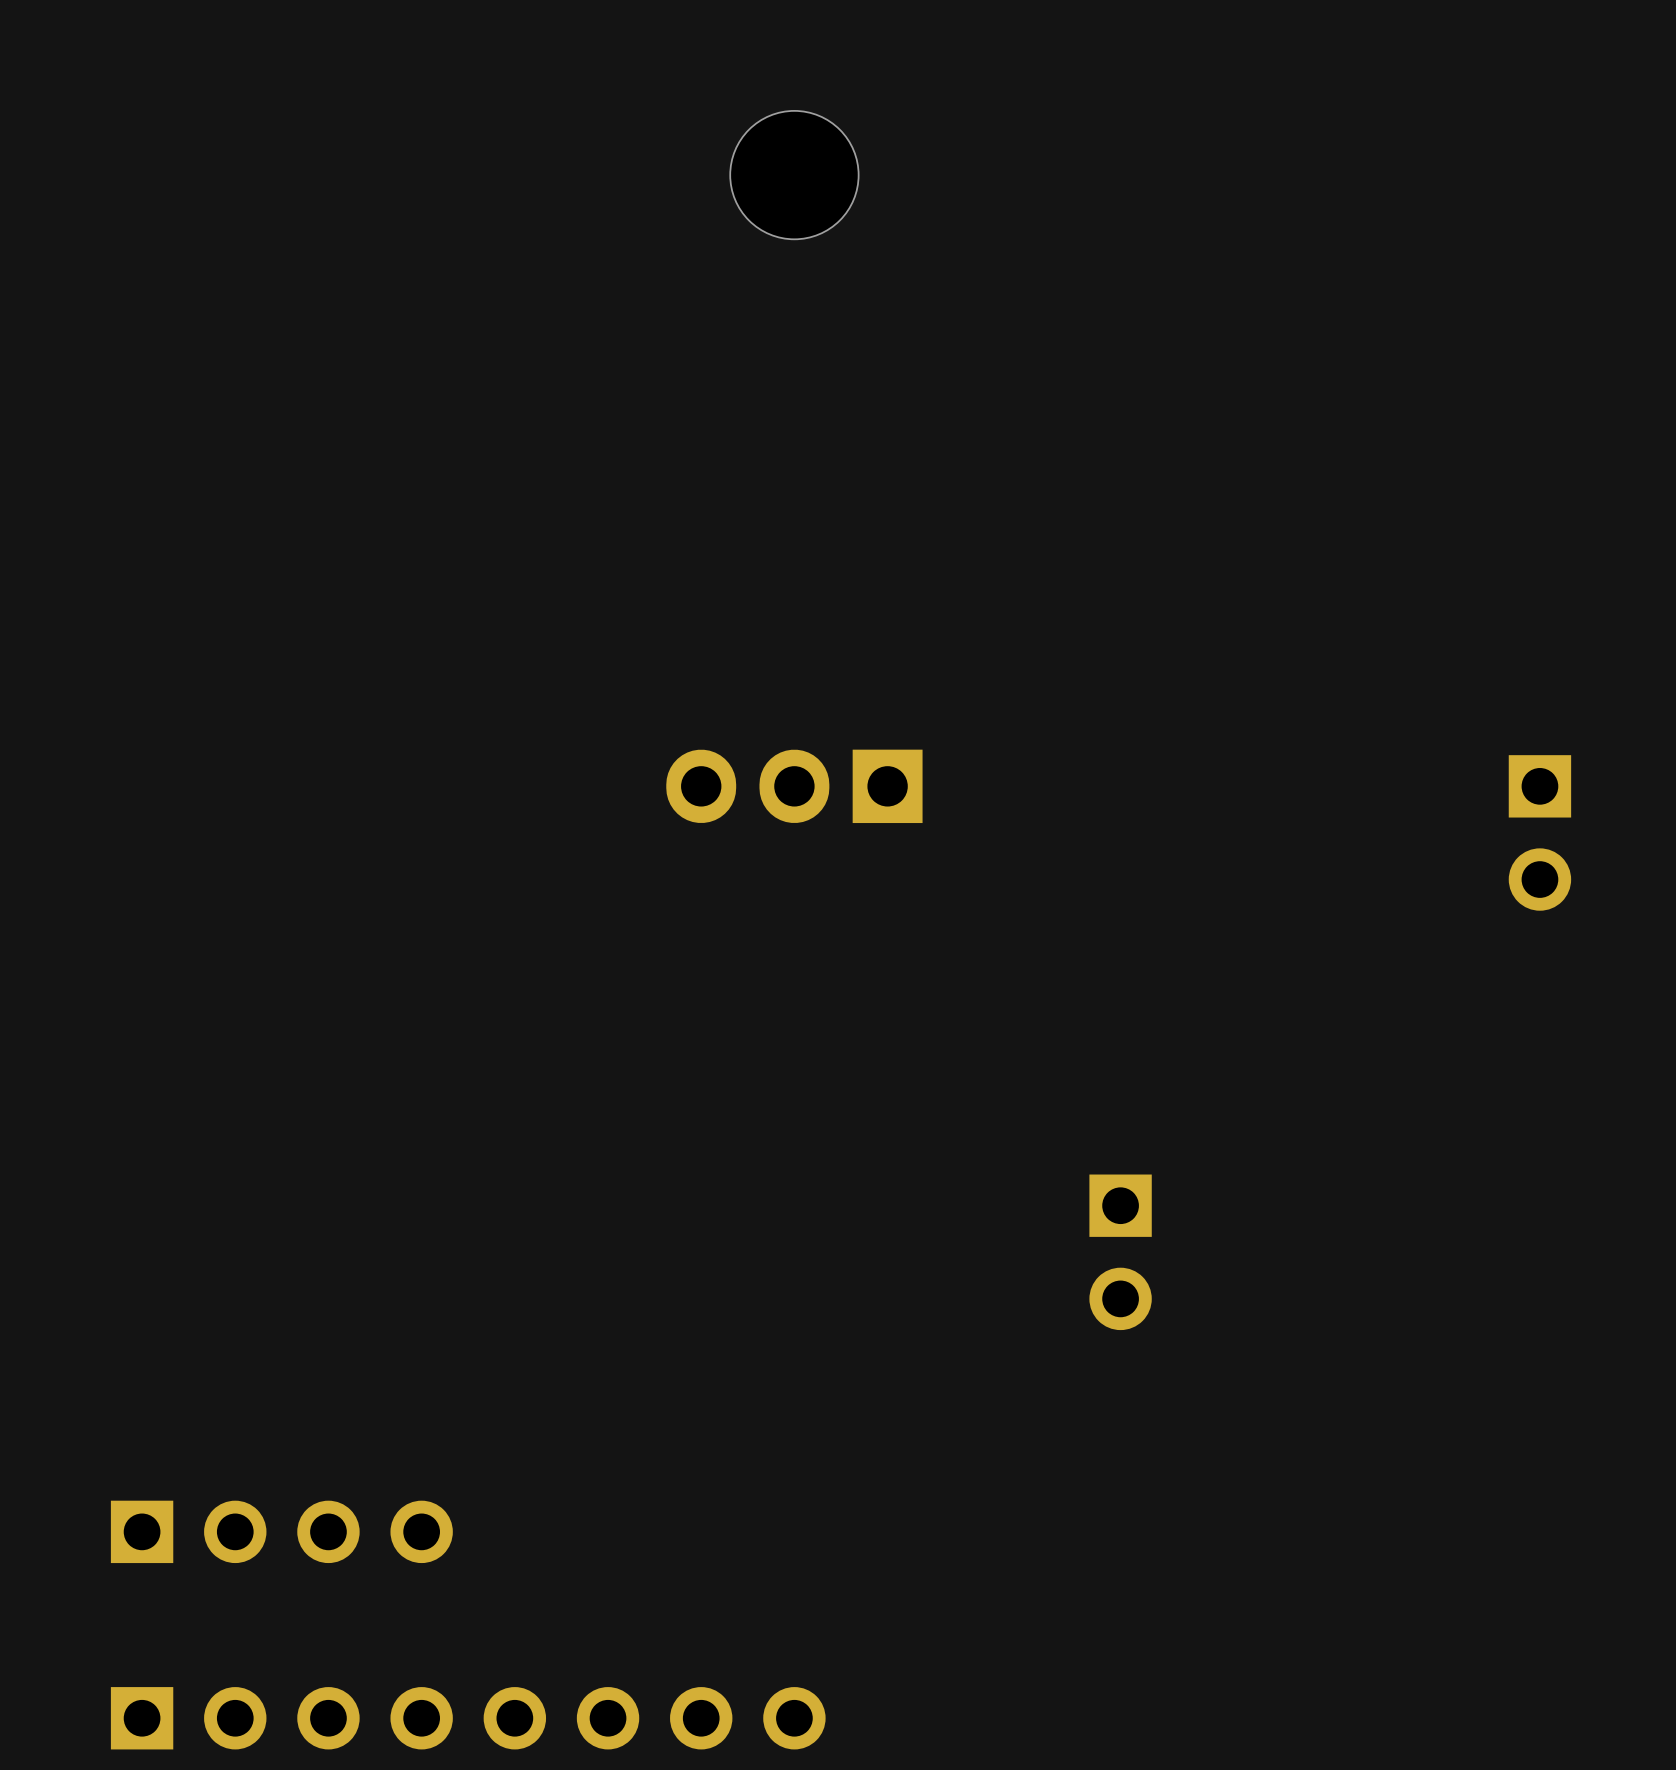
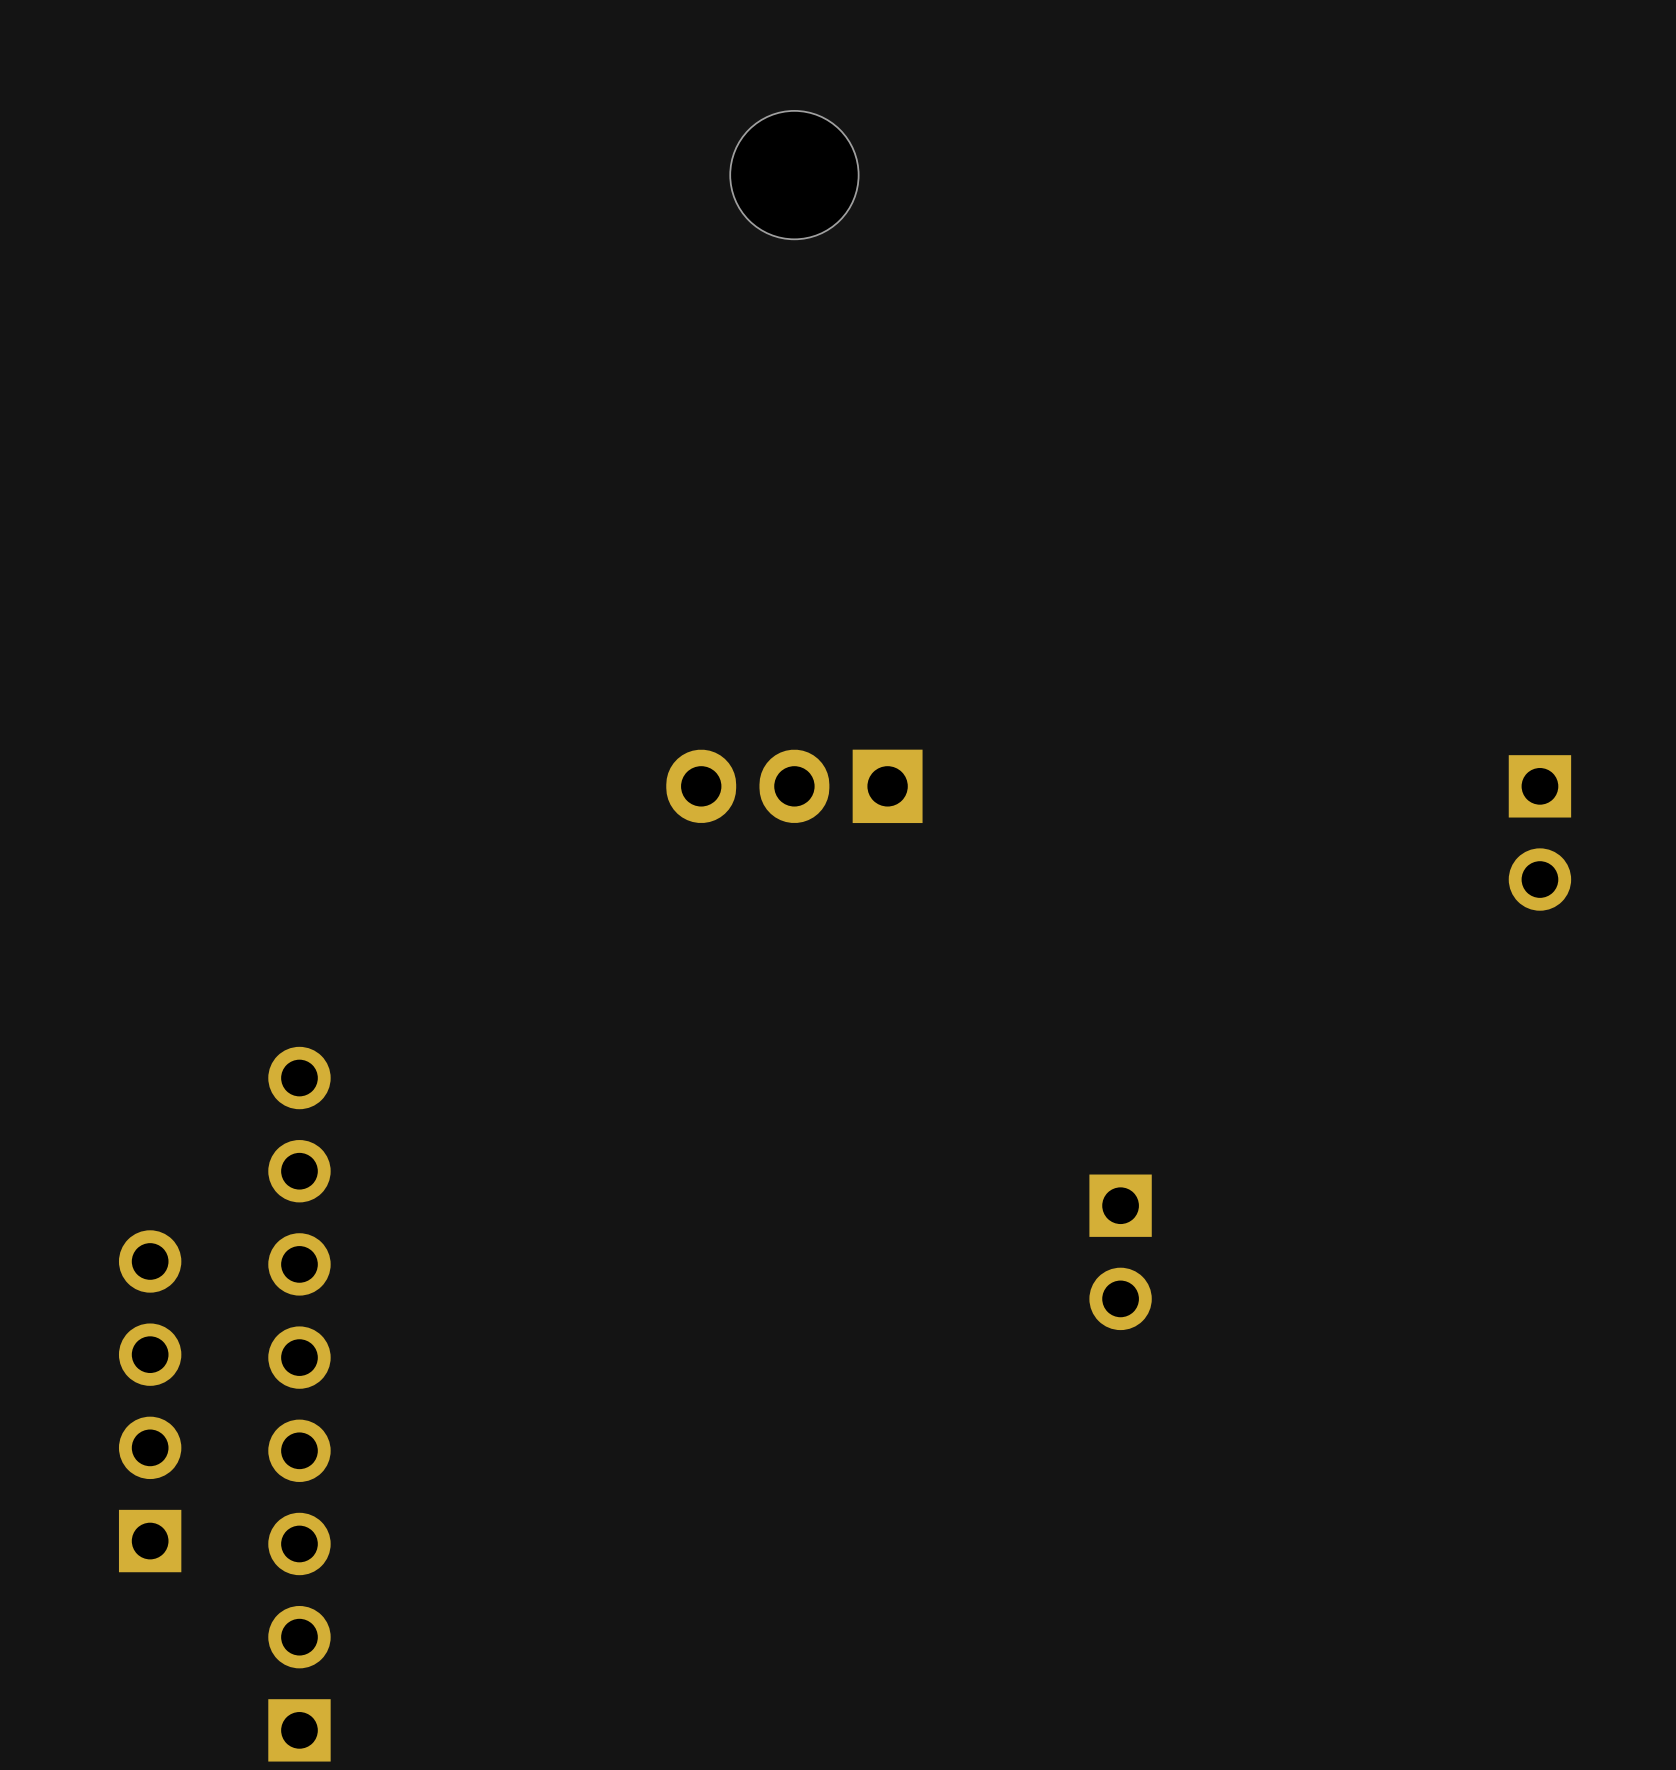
part rotation: 0° (281, 1531) -> 90° counterclockwise (150, 1401)
part rotation: 0° (468, 1718) -> 90° counterclockwise (299, 1404)

